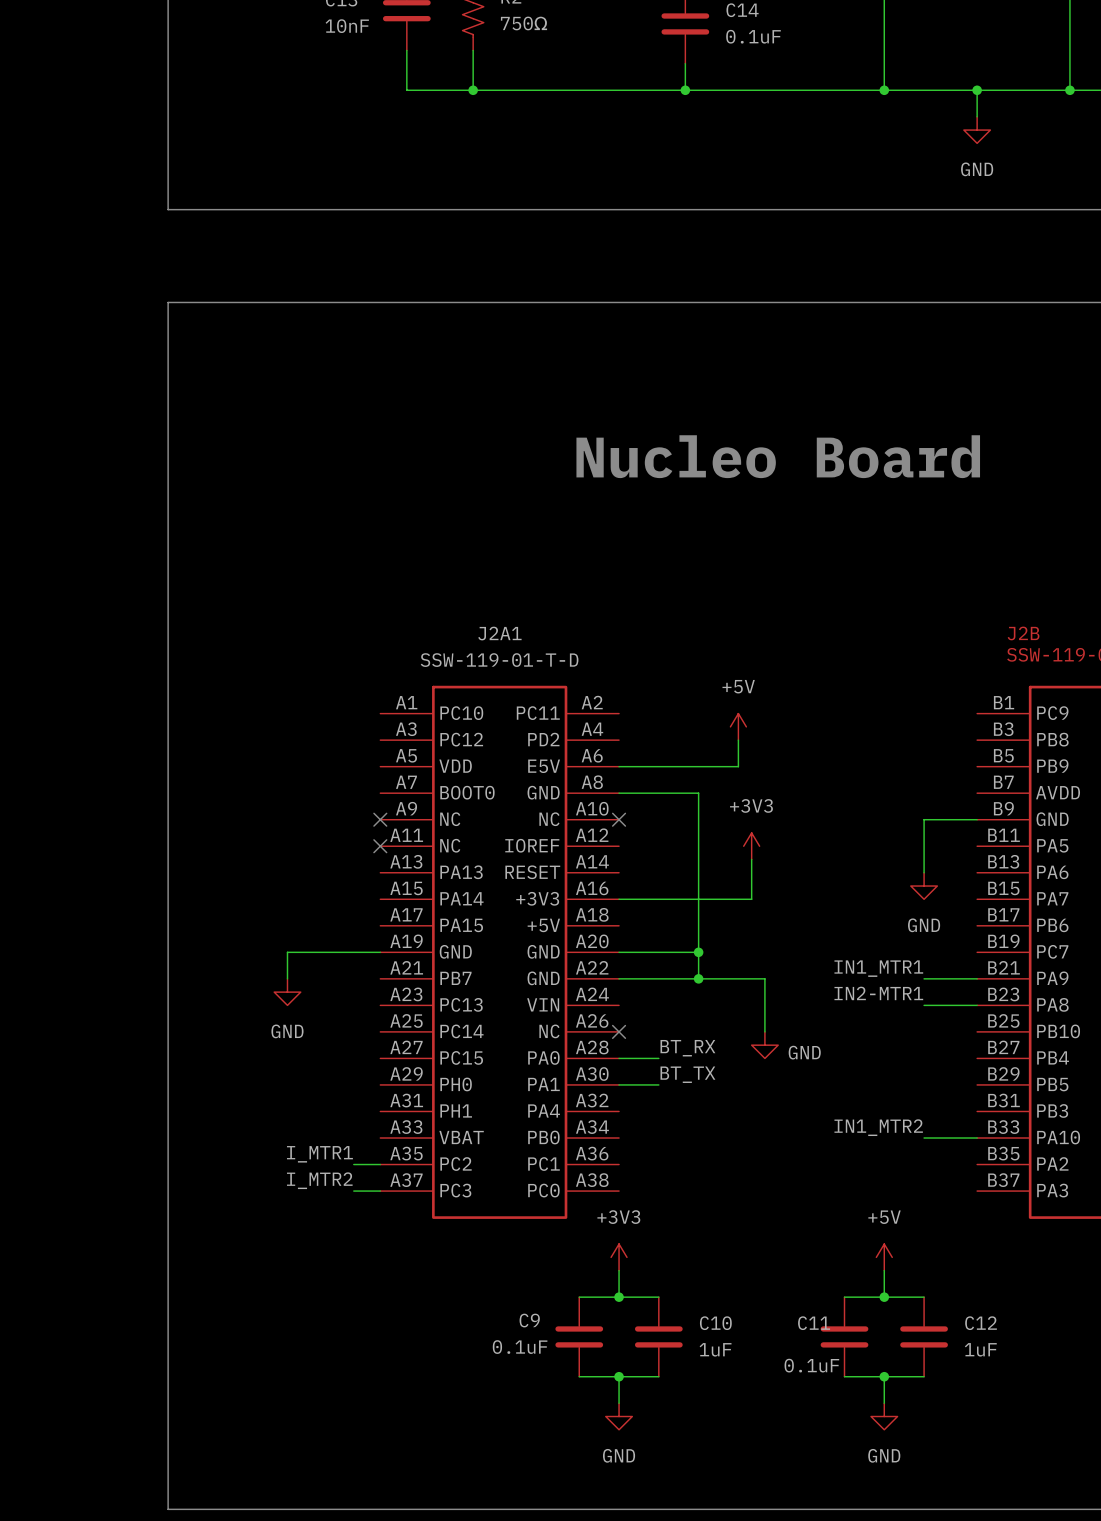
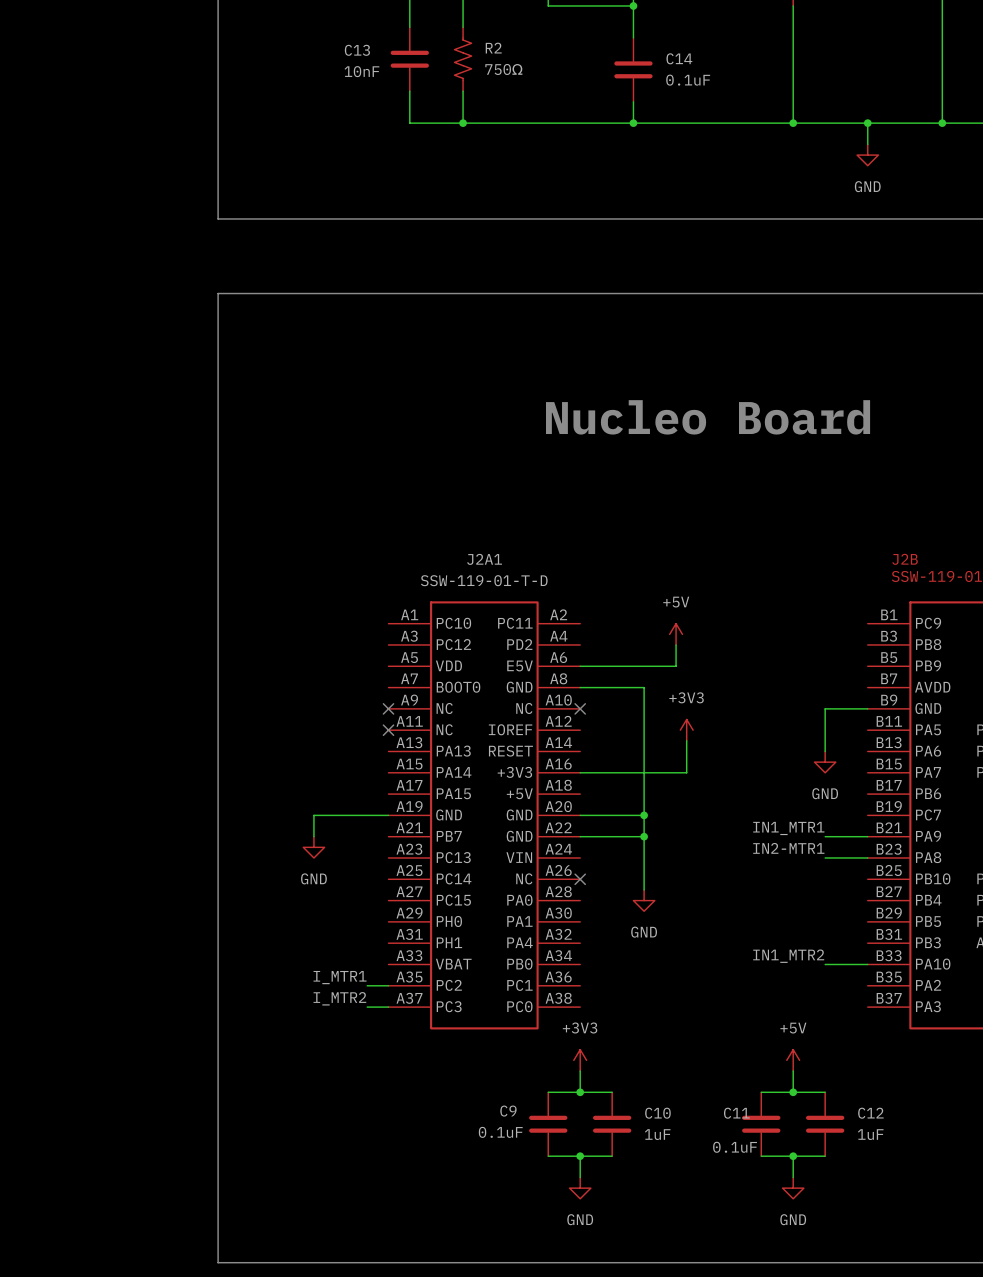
wire: (698, 978) (764, 978) (764, 1031) -> (644, 836) (644, 889)
power symbol position: GND (764, 1045) -> GND (644, 900)
label: BT_RX (687, 1048) -> none
power symbol text position: GND (804, 1052) -> GND (644, 932)
wire: (619, 1058) (658, 1058) -> none
label: BT_TX (687, 1074) -> none
wire: (619, 1084) (658, 1084) -> none

